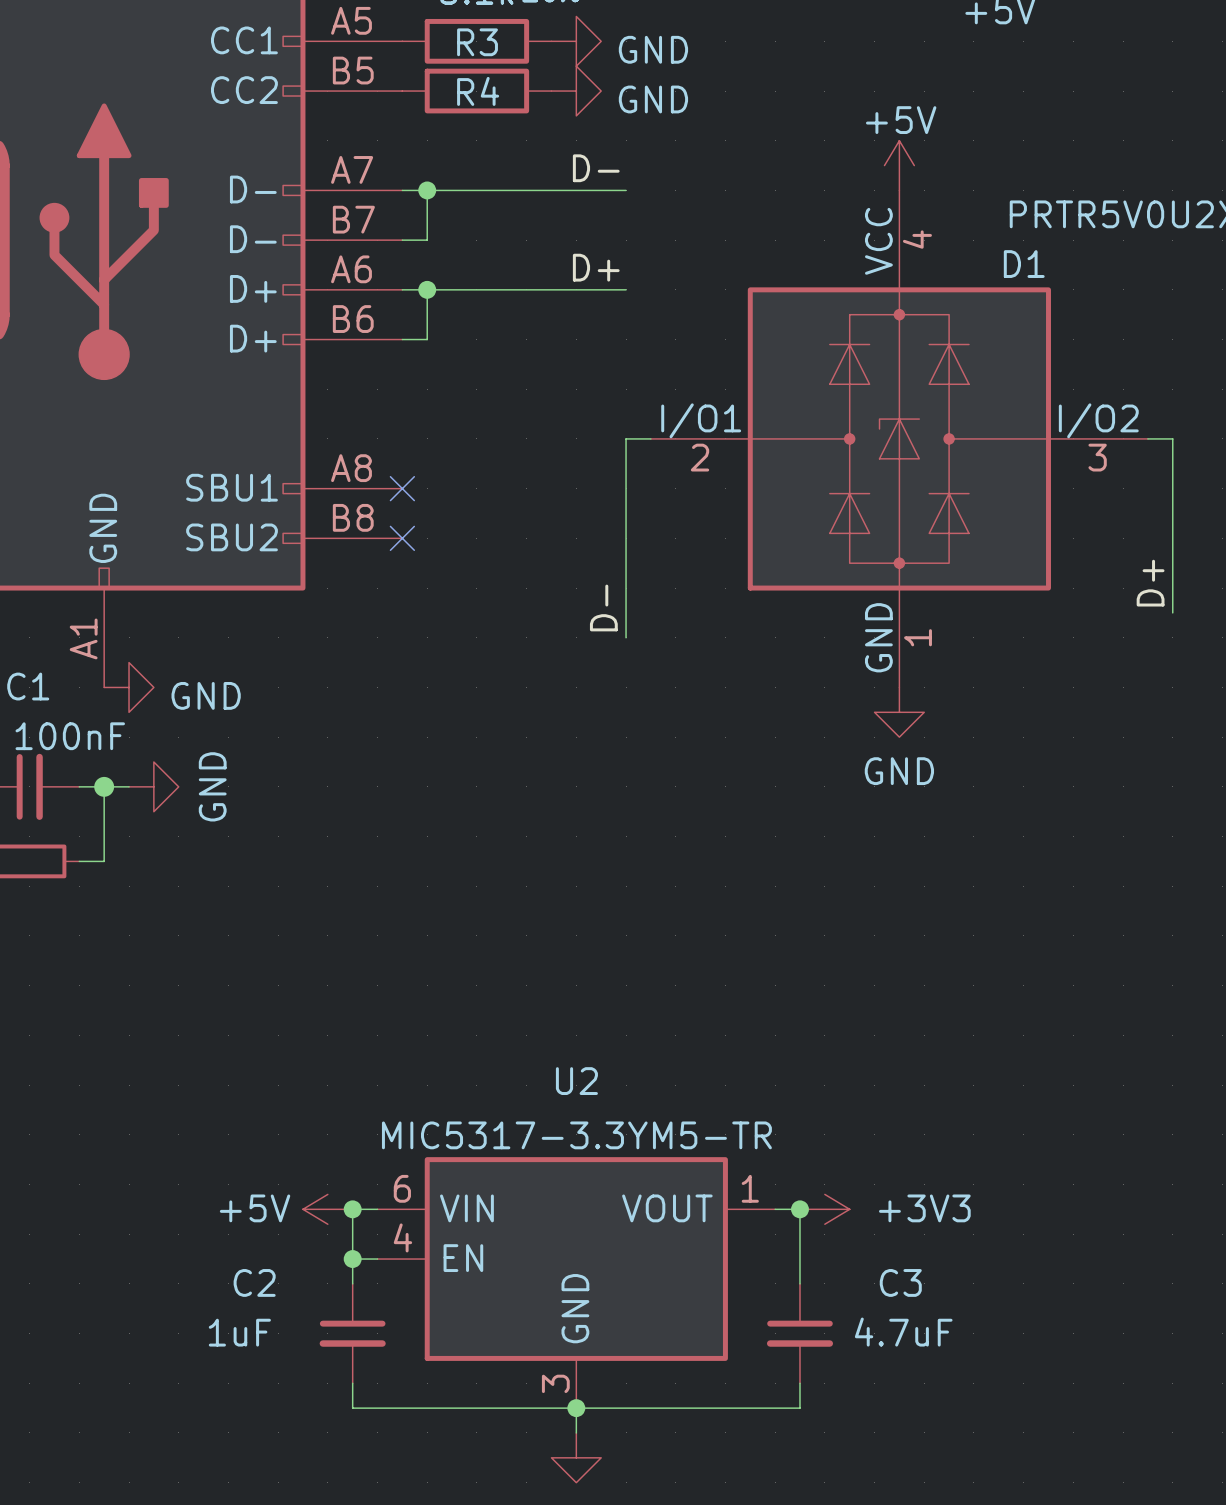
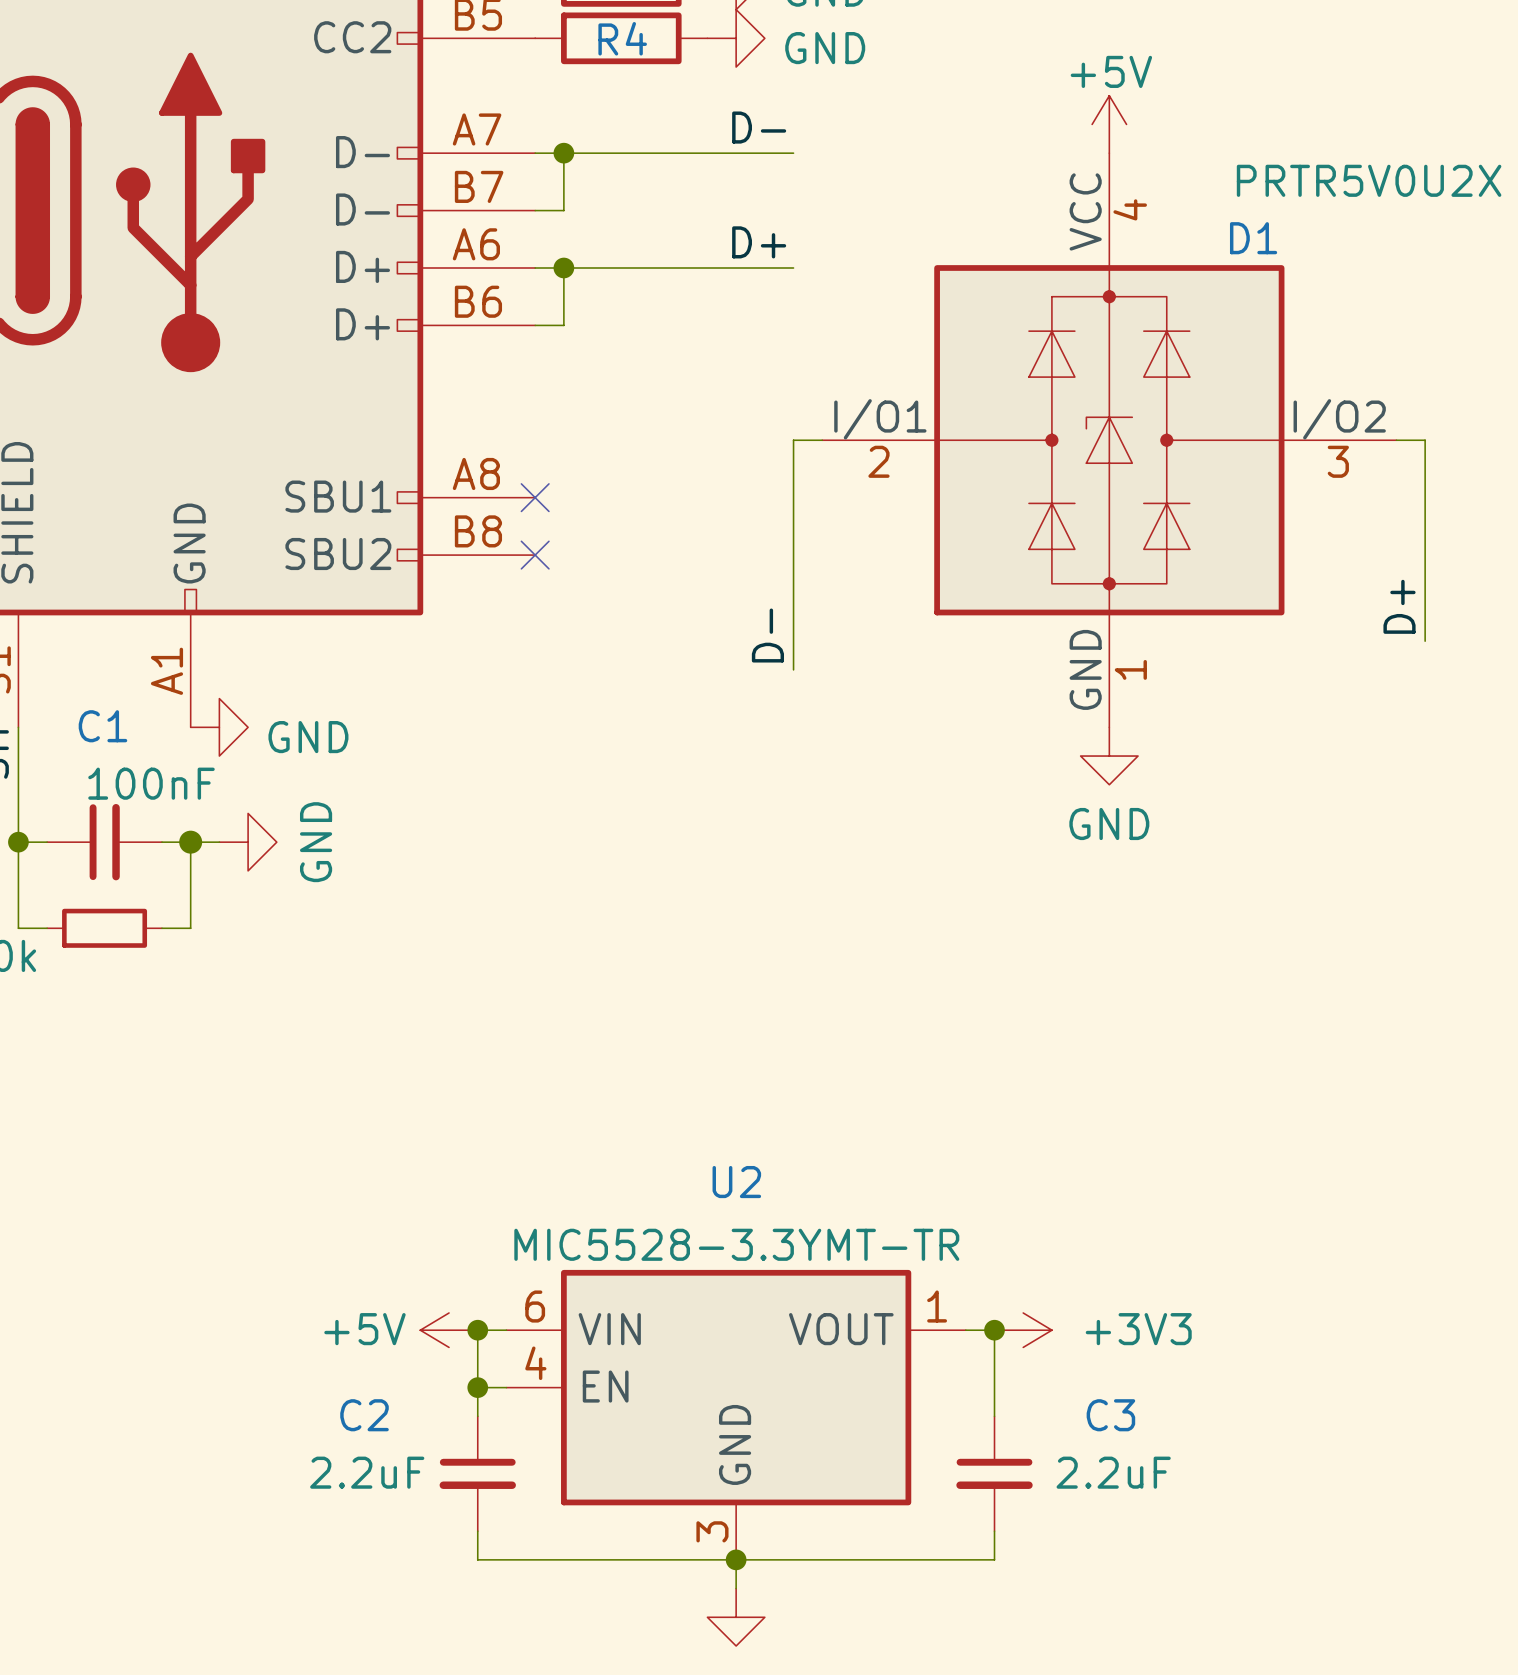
U2 value: MIC5317-3.3YM5-TR (576, 1135) -> MIC5528-3.3YMT-TR (736, 1244)
C2 value: 1uF (239, 1332) -> 2.2uF (367, 1472)
C3 value: 4.7uF (903, 1332) -> 2.2uF (1113, 1472)

